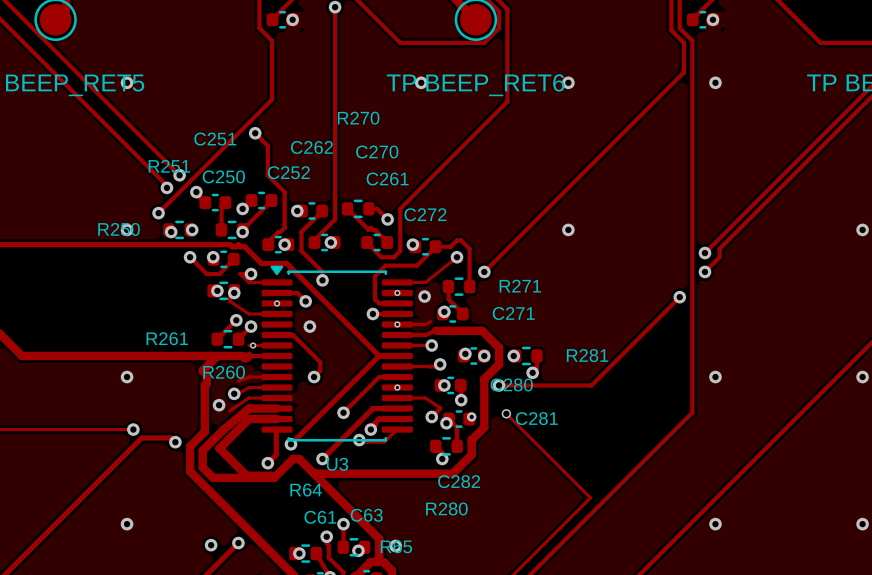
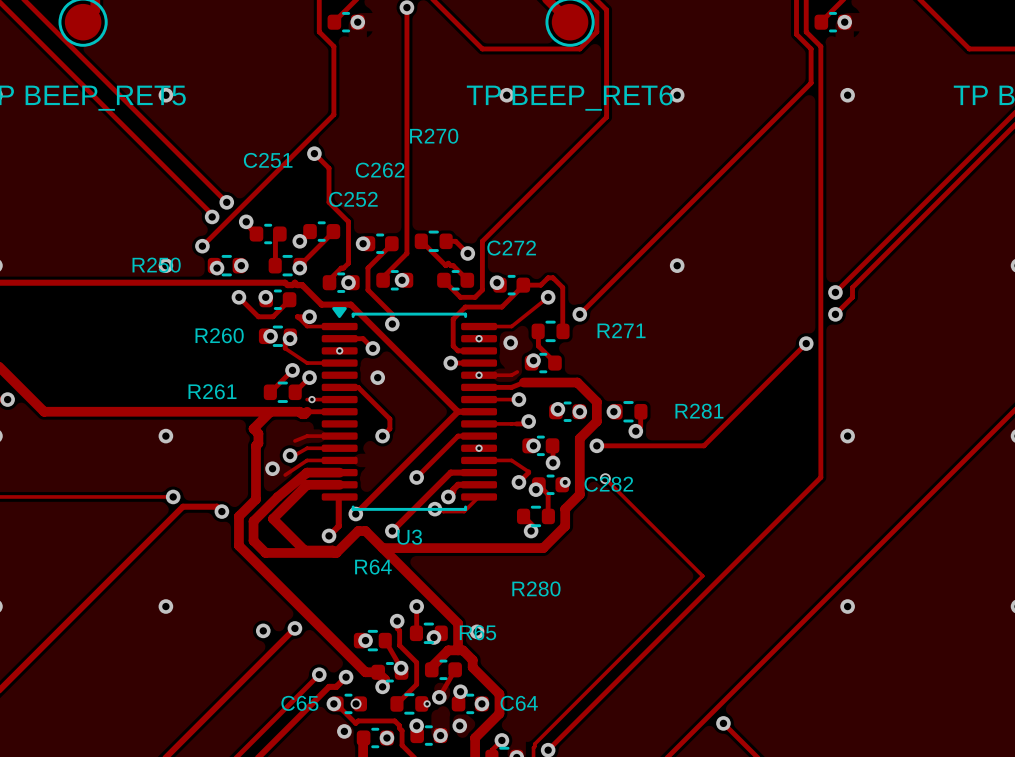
C270 name: C270 (377, 152) -> none
R251 name: R251 (169, 166) -> none
C250 name: C250 (223, 176) -> none
C261 name: C261 (387, 179) -> none
C271 name: C271 (513, 313) -> none
R260 name position: R260 (224, 372) -> R260 (219, 335)
C280 name: C280 (511, 384) -> none
C281 name: C281 (536, 418) -> none
C282 name position: C282 (459, 481) -> C282 (608, 484)
C63 name: C63 (366, 515) -> none
C61 name: C61 (320, 517) -> none

